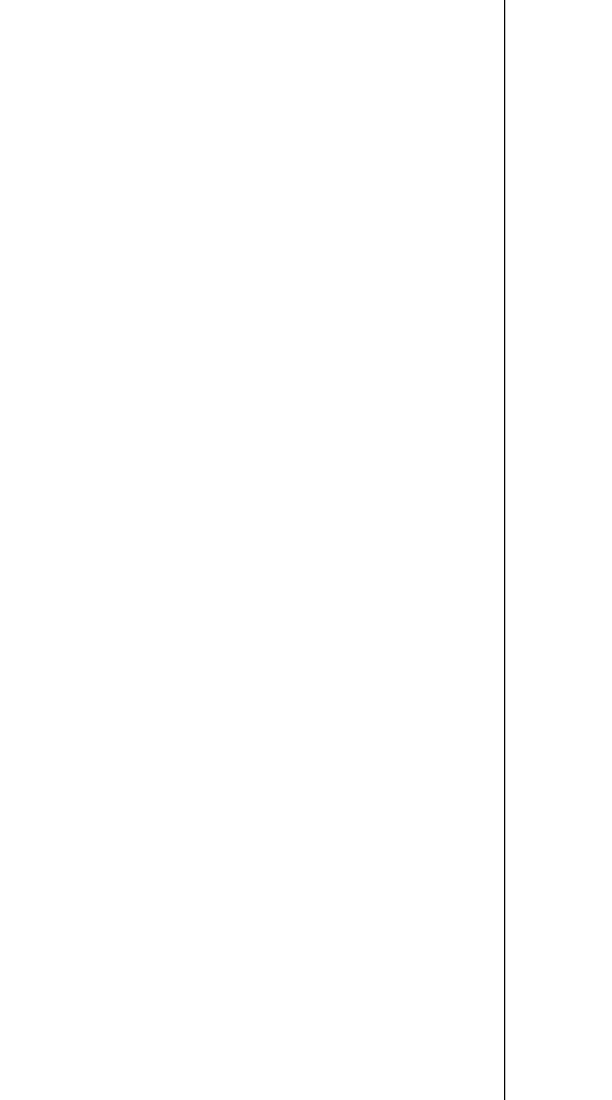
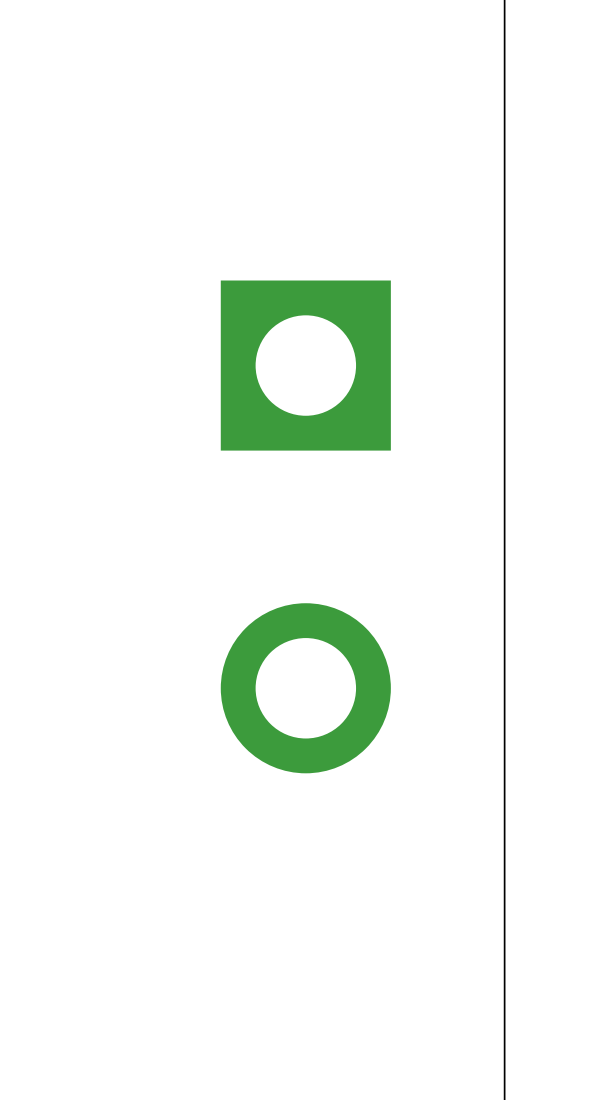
part: none -> (305, 526)

